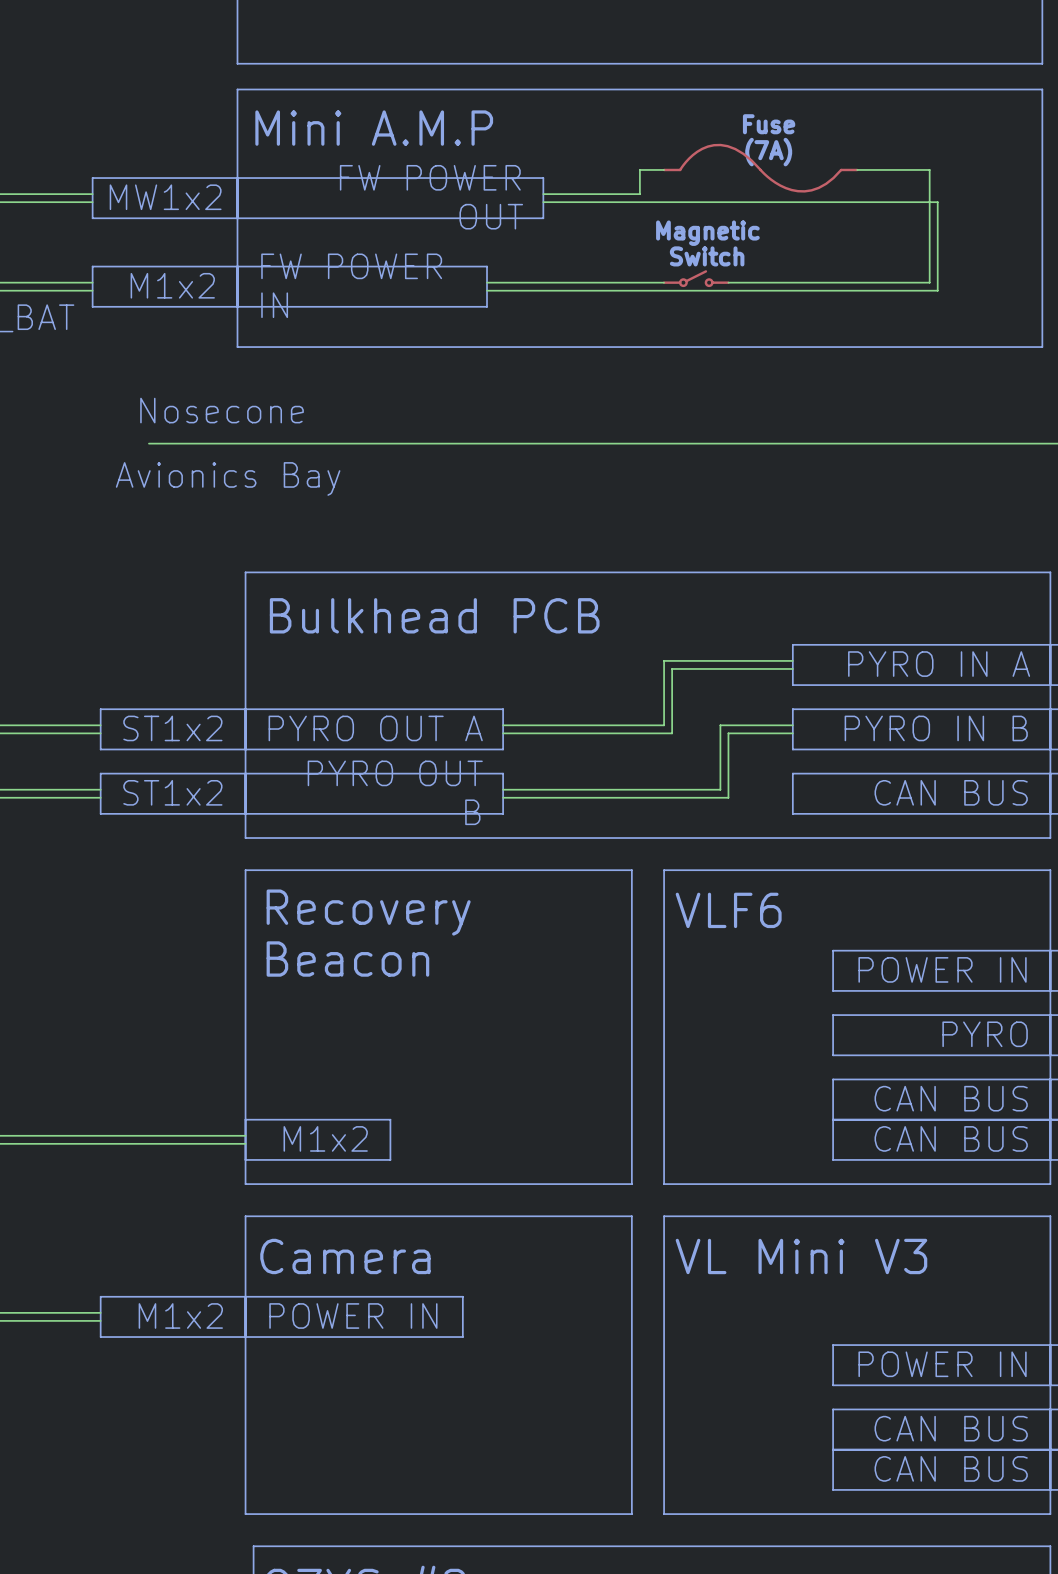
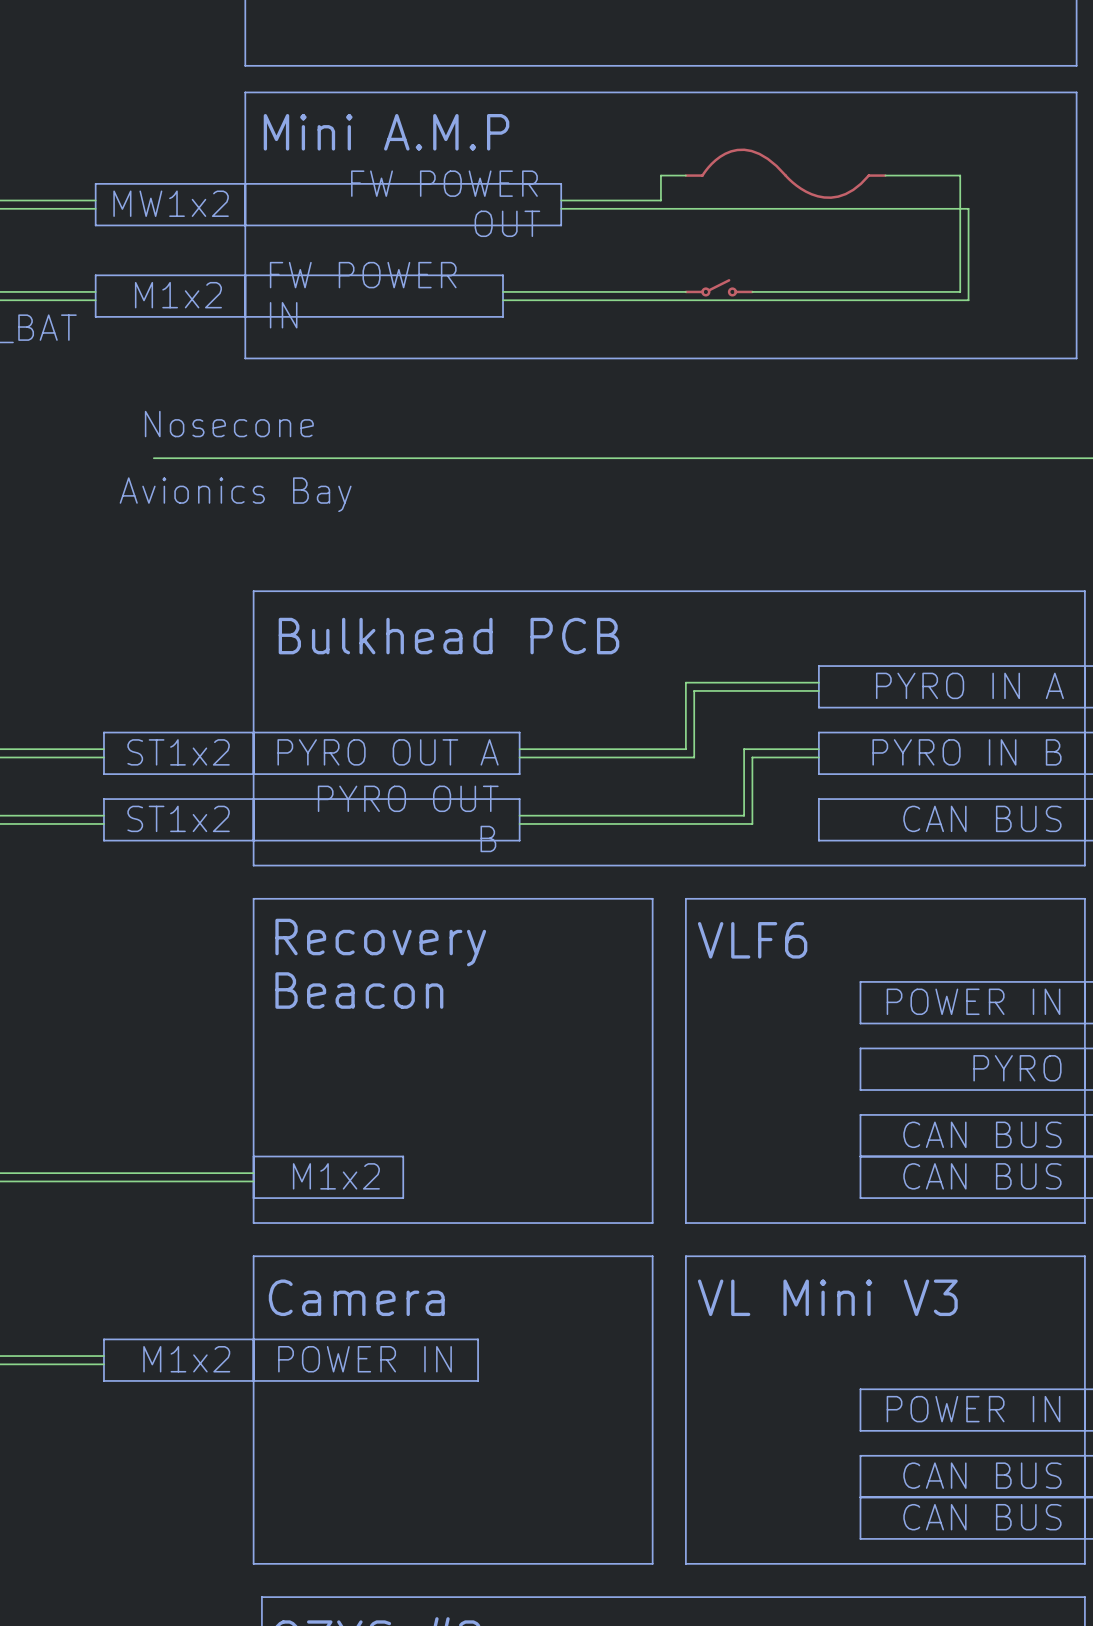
text: Fuse (769, 124) -> none
text: (7A) (768, 152) -> none
text: Magnetic (707, 233) -> none
text: Switch (707, 256) -> none

